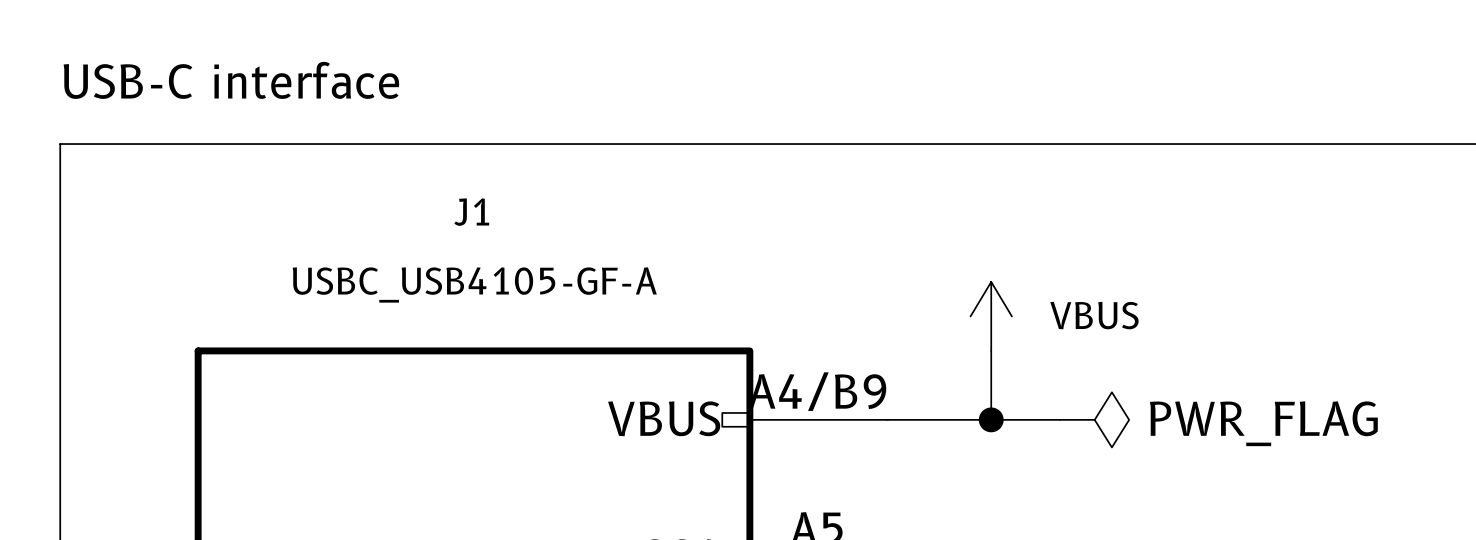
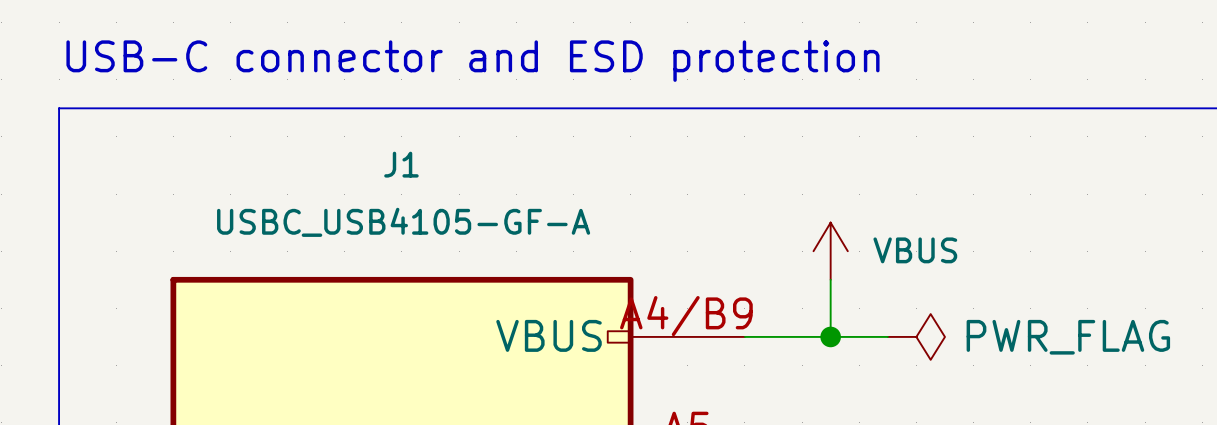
text: USB-C interface (231, 80) -> USB-C connector and ESD protection (472, 61)

